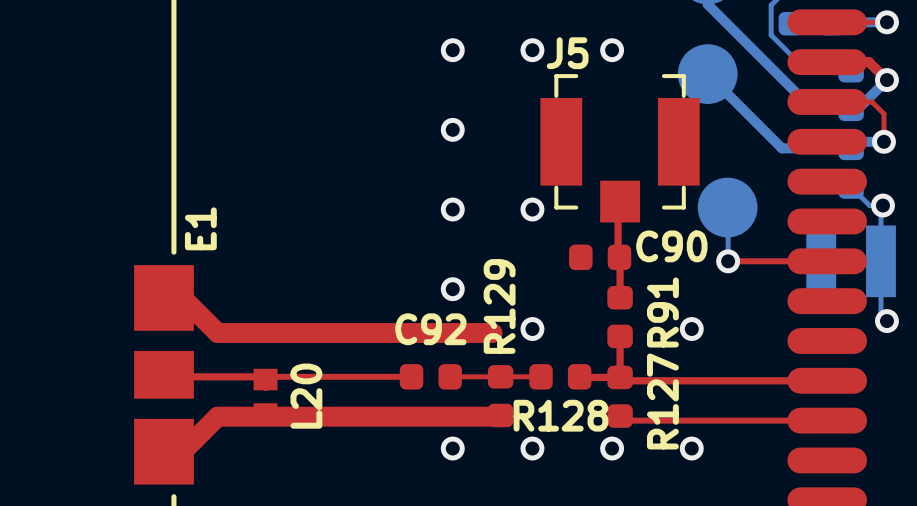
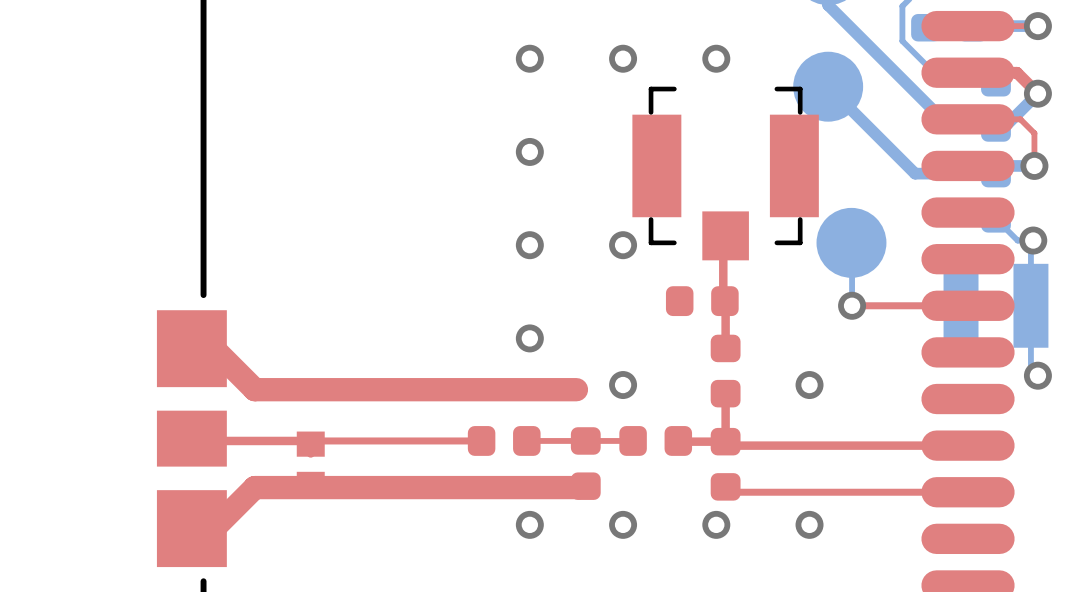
J5 name: J5 (567, 53) -> none
E1 name: E1 (200, 228) -> none
C90 name: C90 (671, 246) -> none
R129 name: R129 (499, 306) -> none
R91 name: R91 (662, 312) -> none
C92 name: C92 (430, 329) -> none
L20 name: L20 (306, 396) -> none
R127 name: R127 (662, 401) -> none
R128 name: R128 (560, 415) -> none

